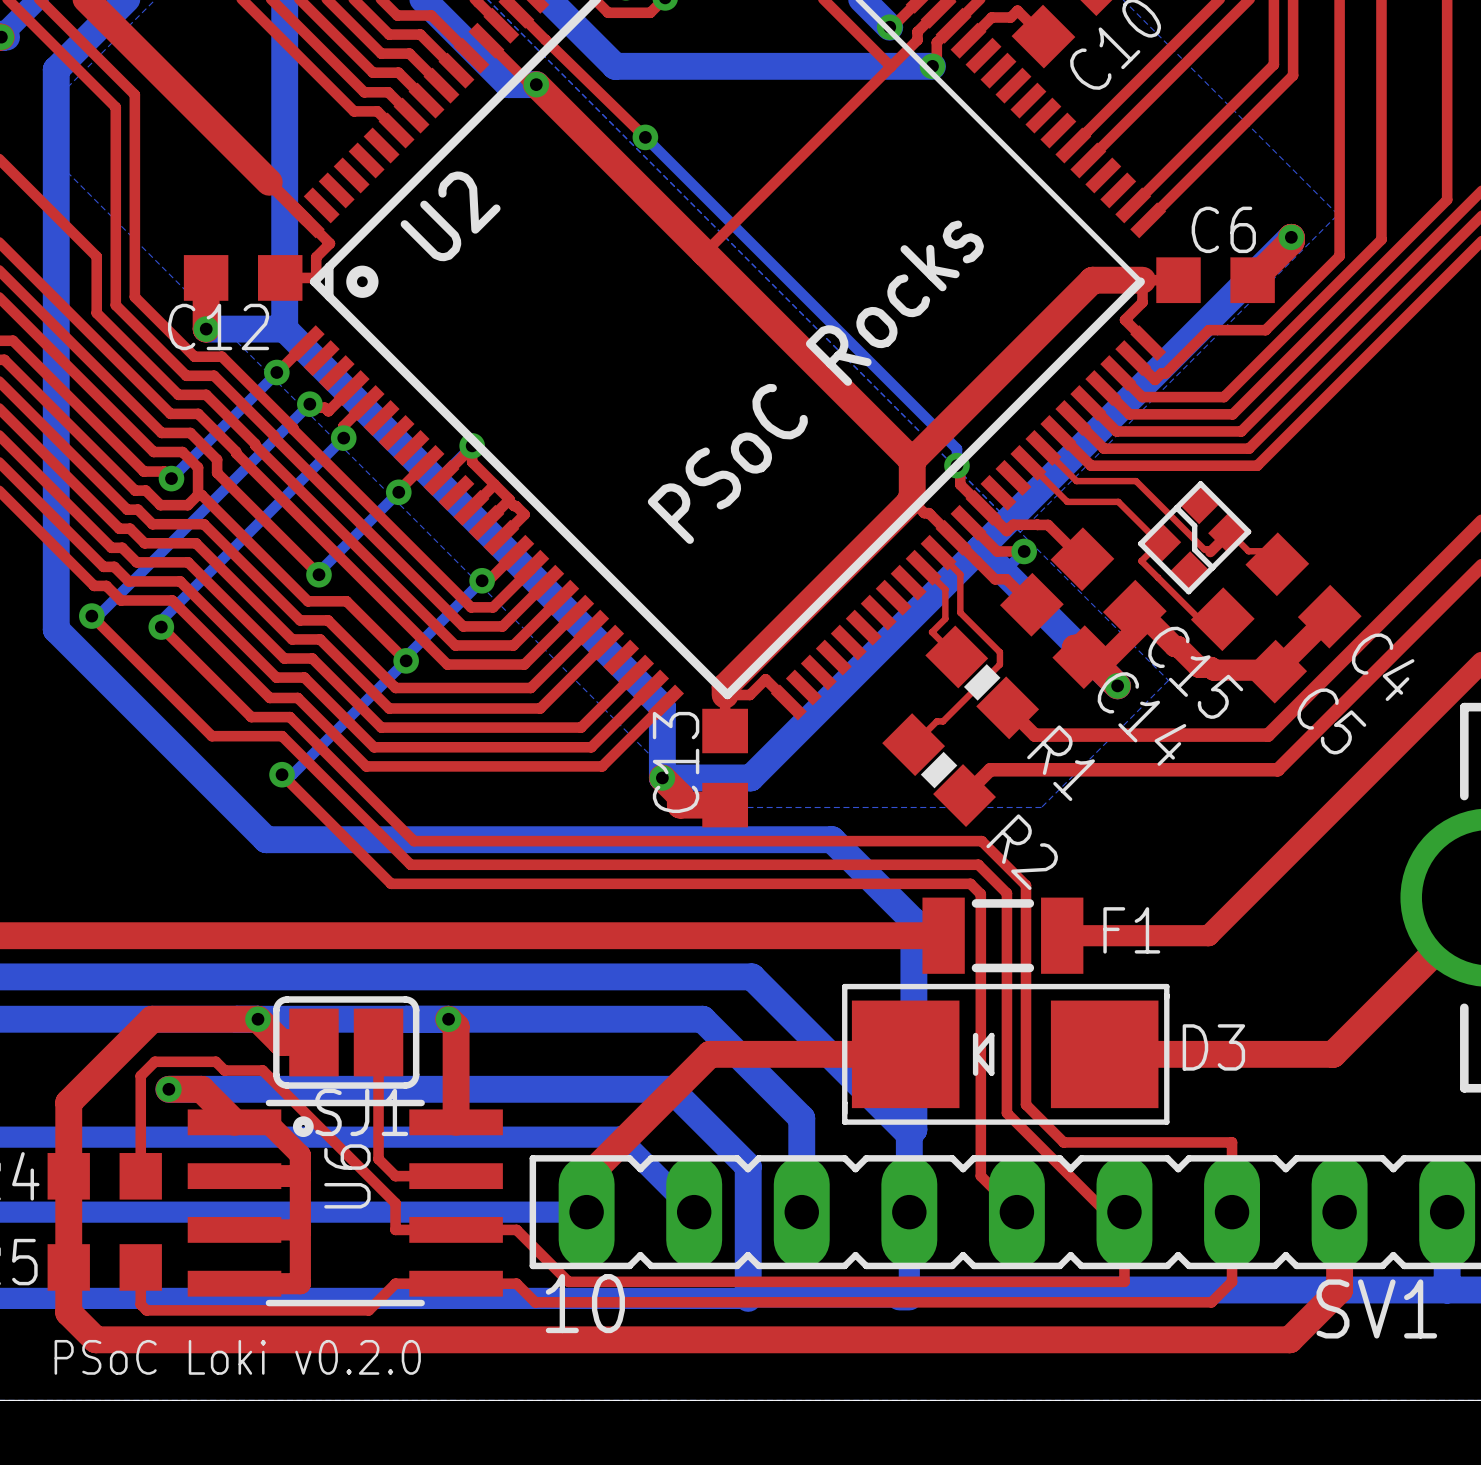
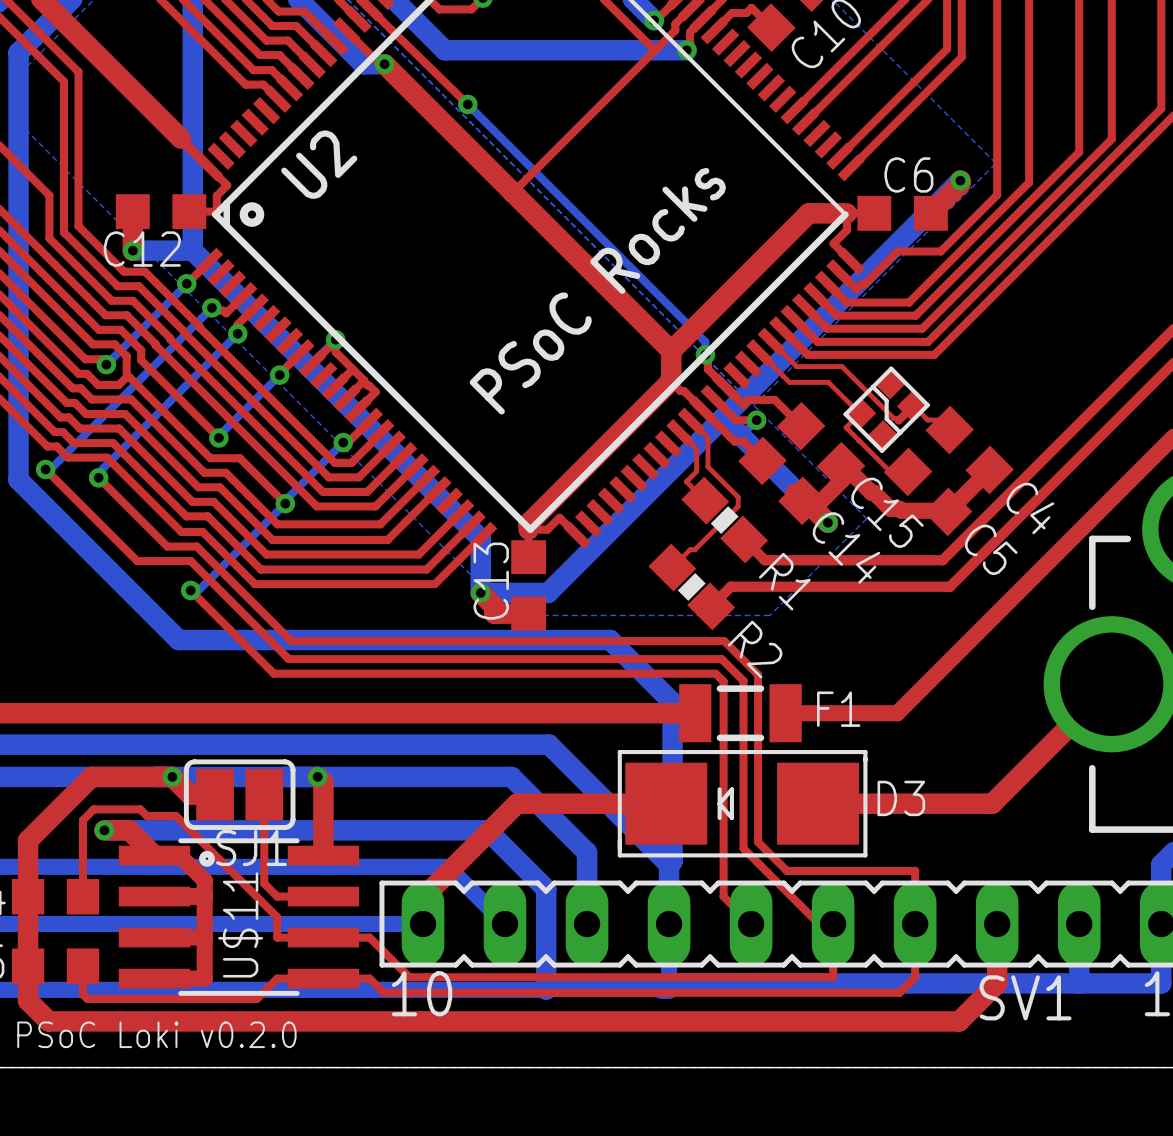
U6 name: U6 (347, 1176) -> U$11 (240, 924)

